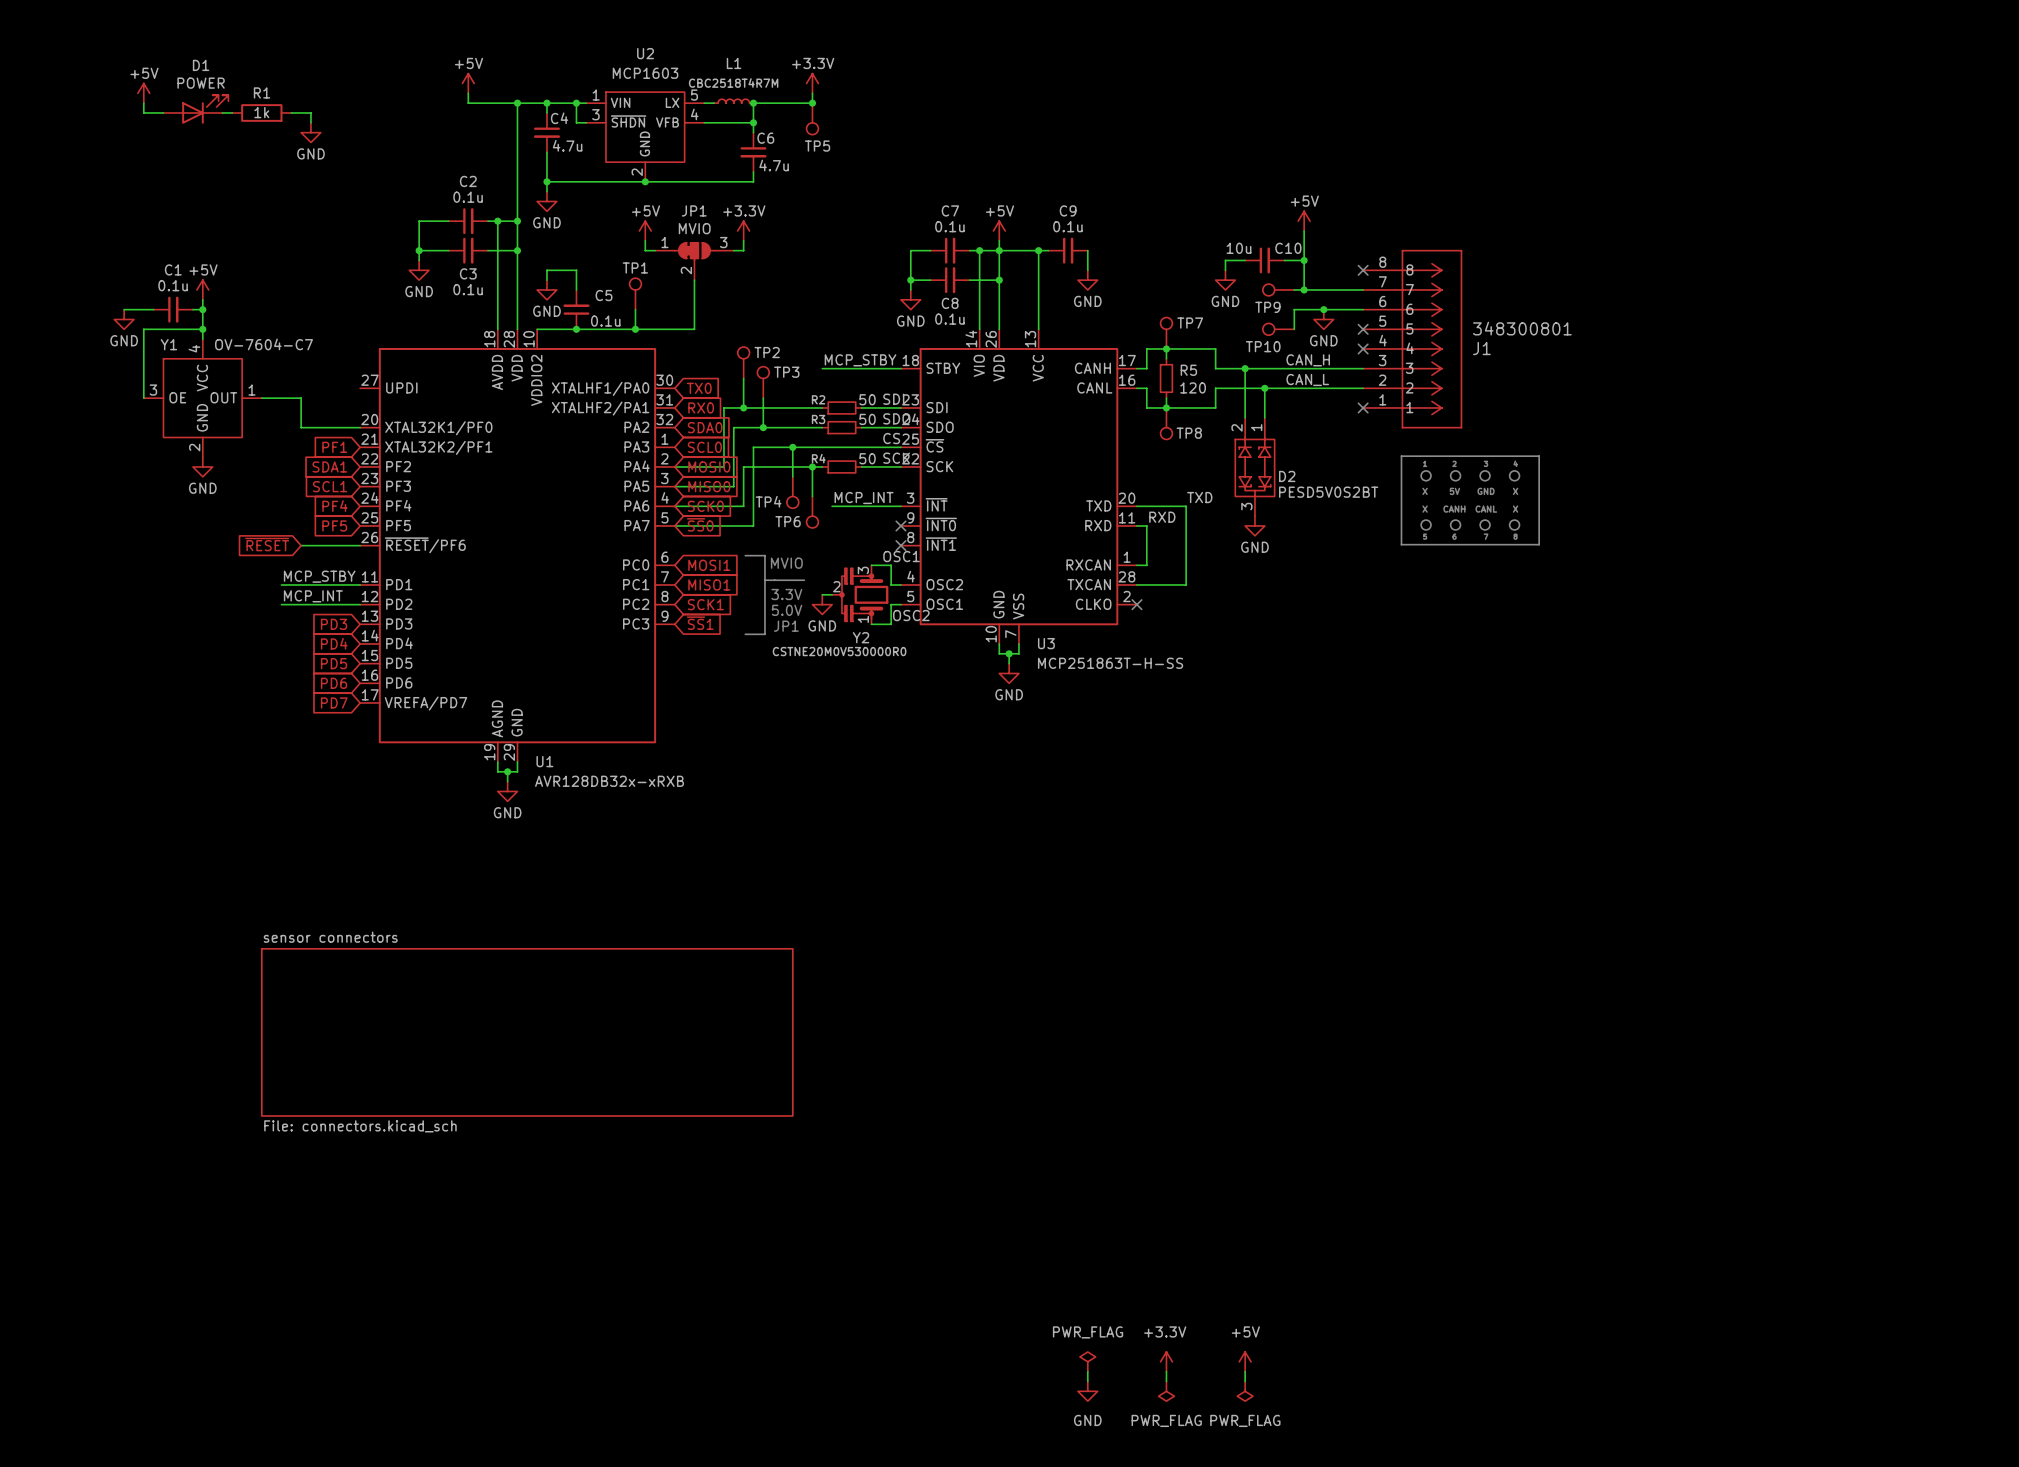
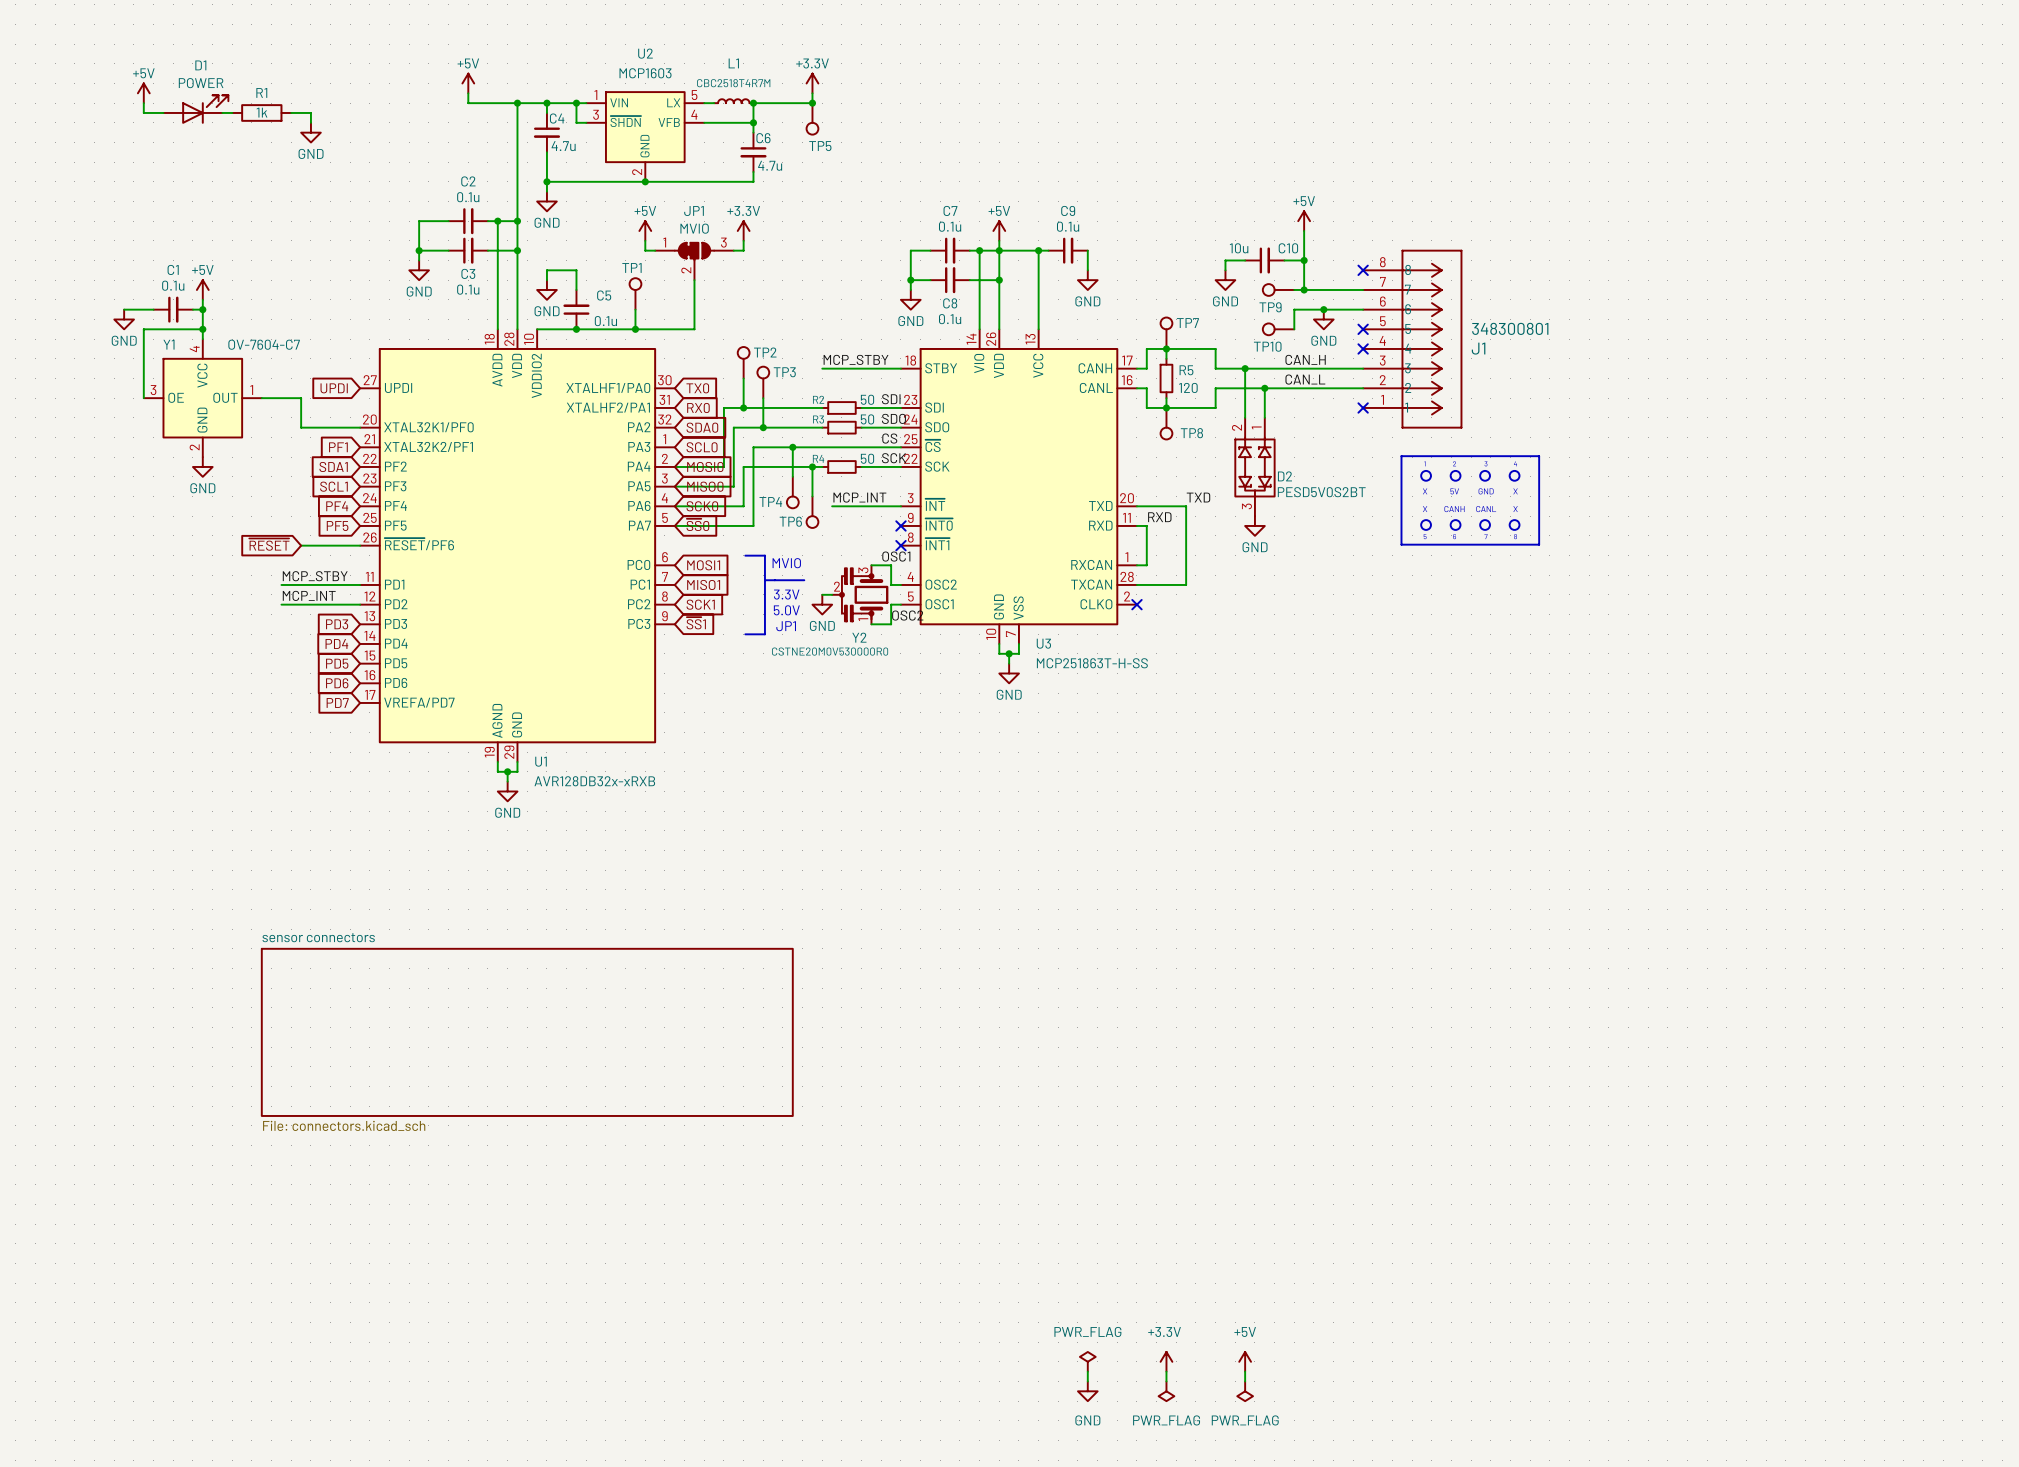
global label: none -> UPDI (334, 388)

